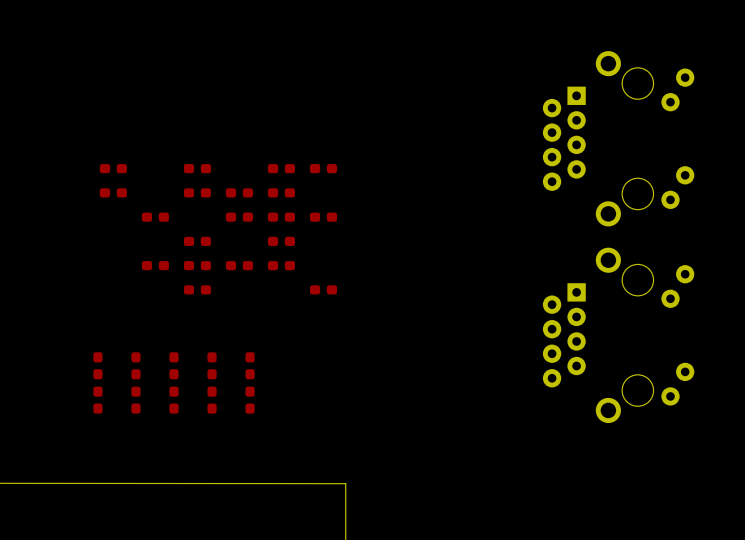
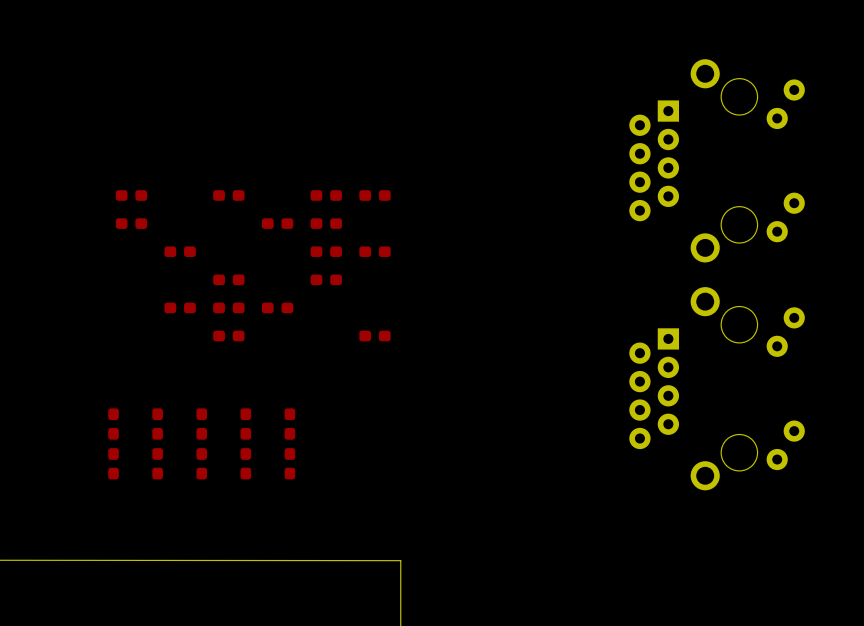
part: (197, 192) -> none
part: (239, 217) -> none
part: (281, 265) -> none

